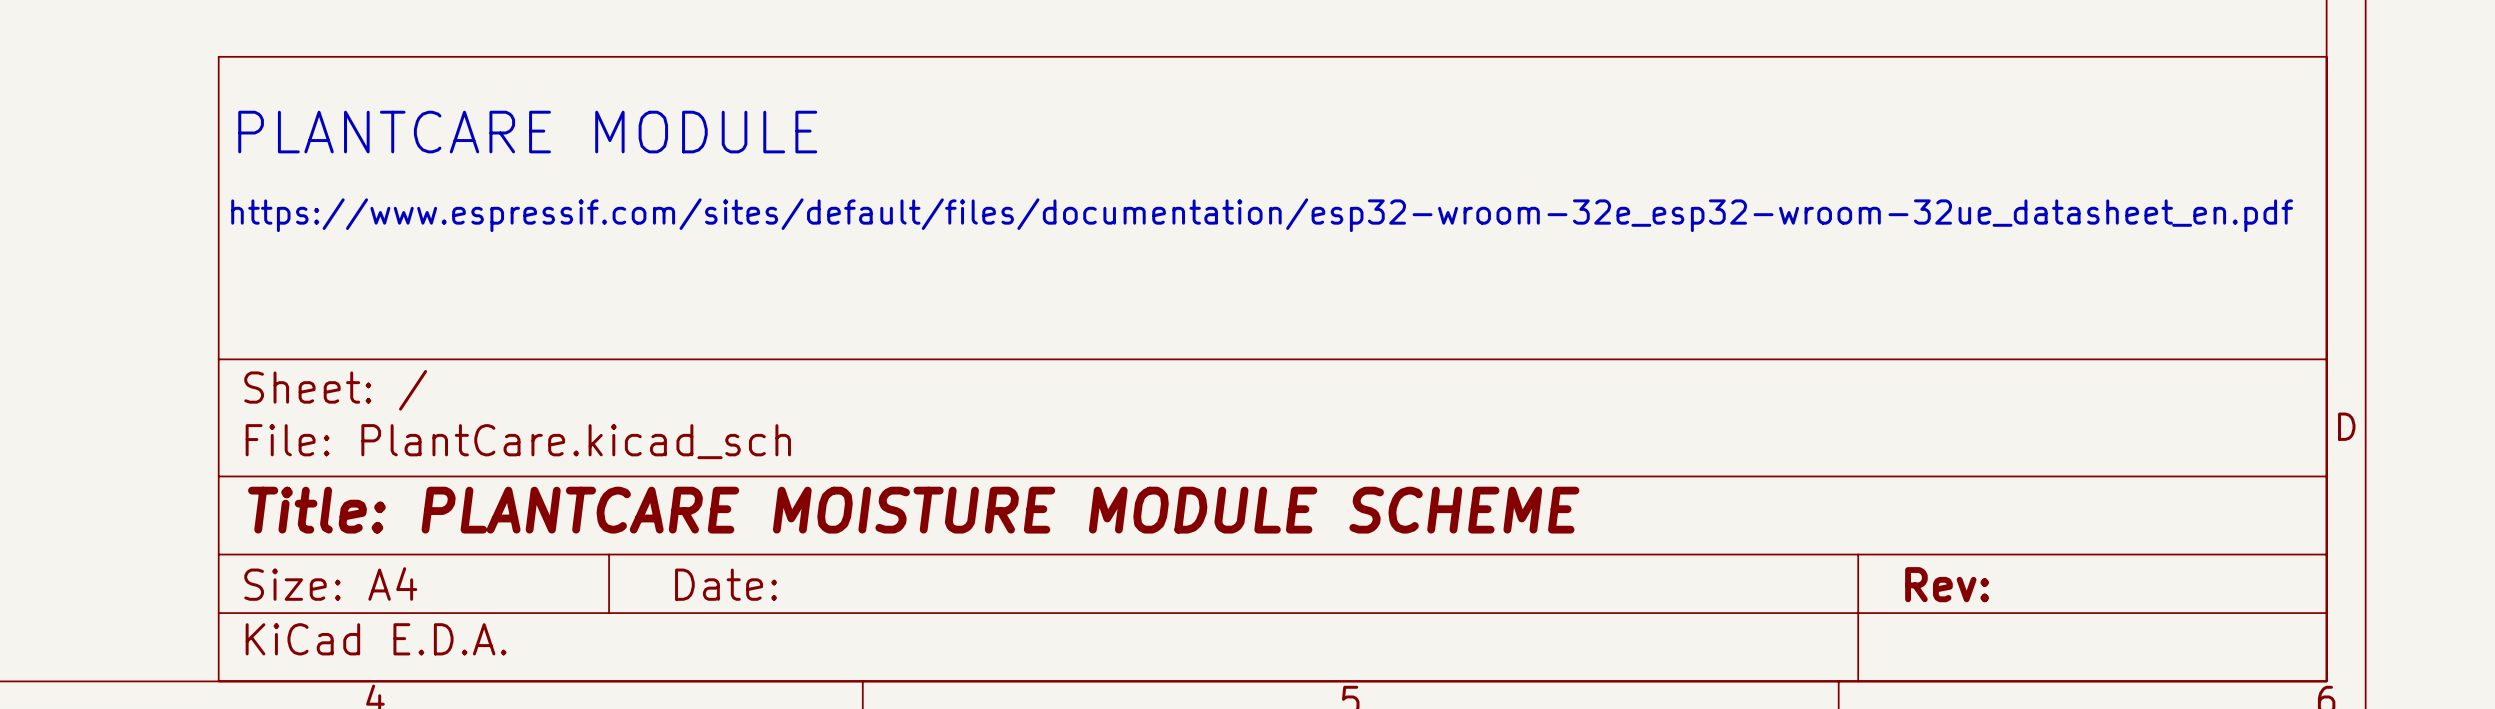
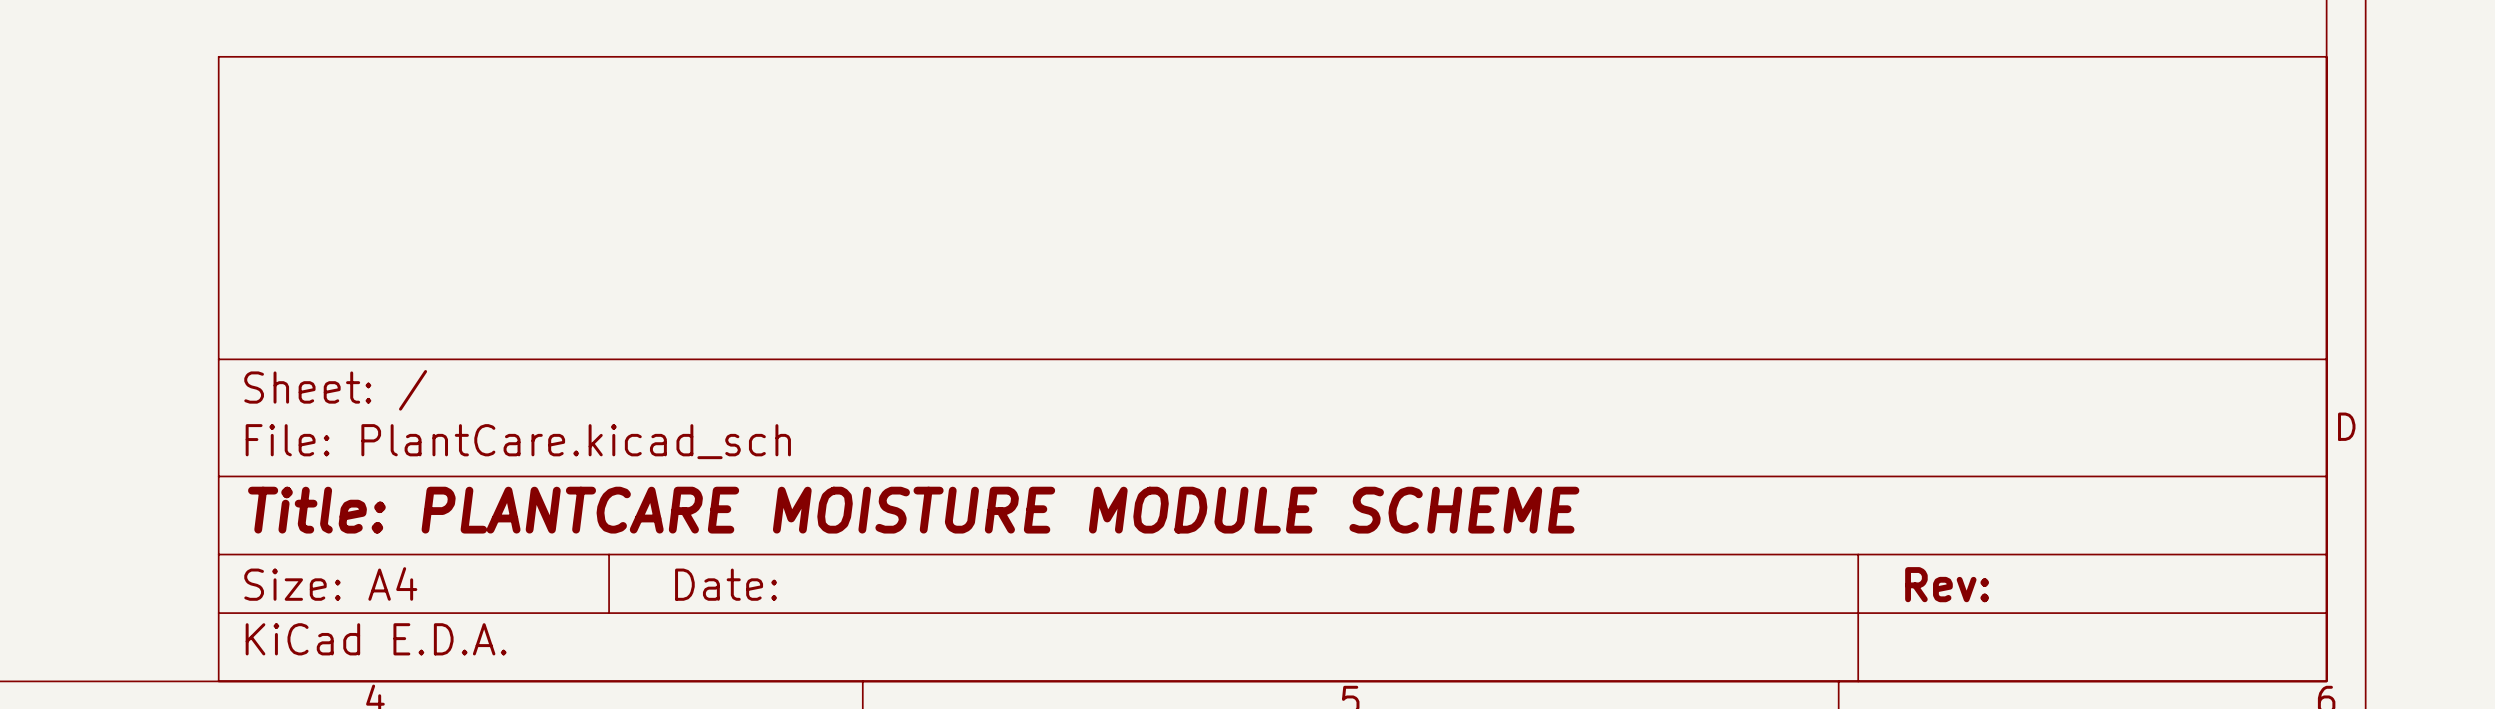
text: PLANTCARE MODULE (527, 132) -> none
text: https://www.espressif.com/sites/default/files/documentation/esp32-wroom-32e_esp32-wroom-32ue_datasheet_en.pdf (1262, 215) -> none

